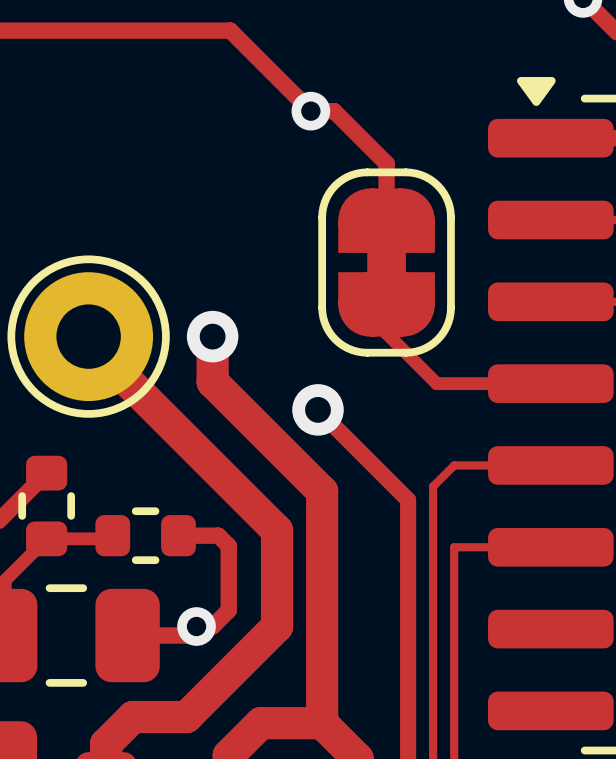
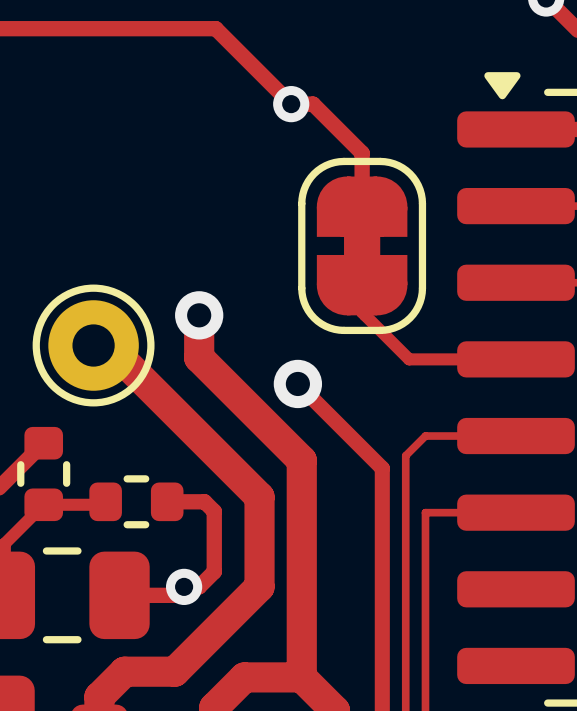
part footprint: [7, 255, 170, 418] -> [32, 284, 155, 407]

